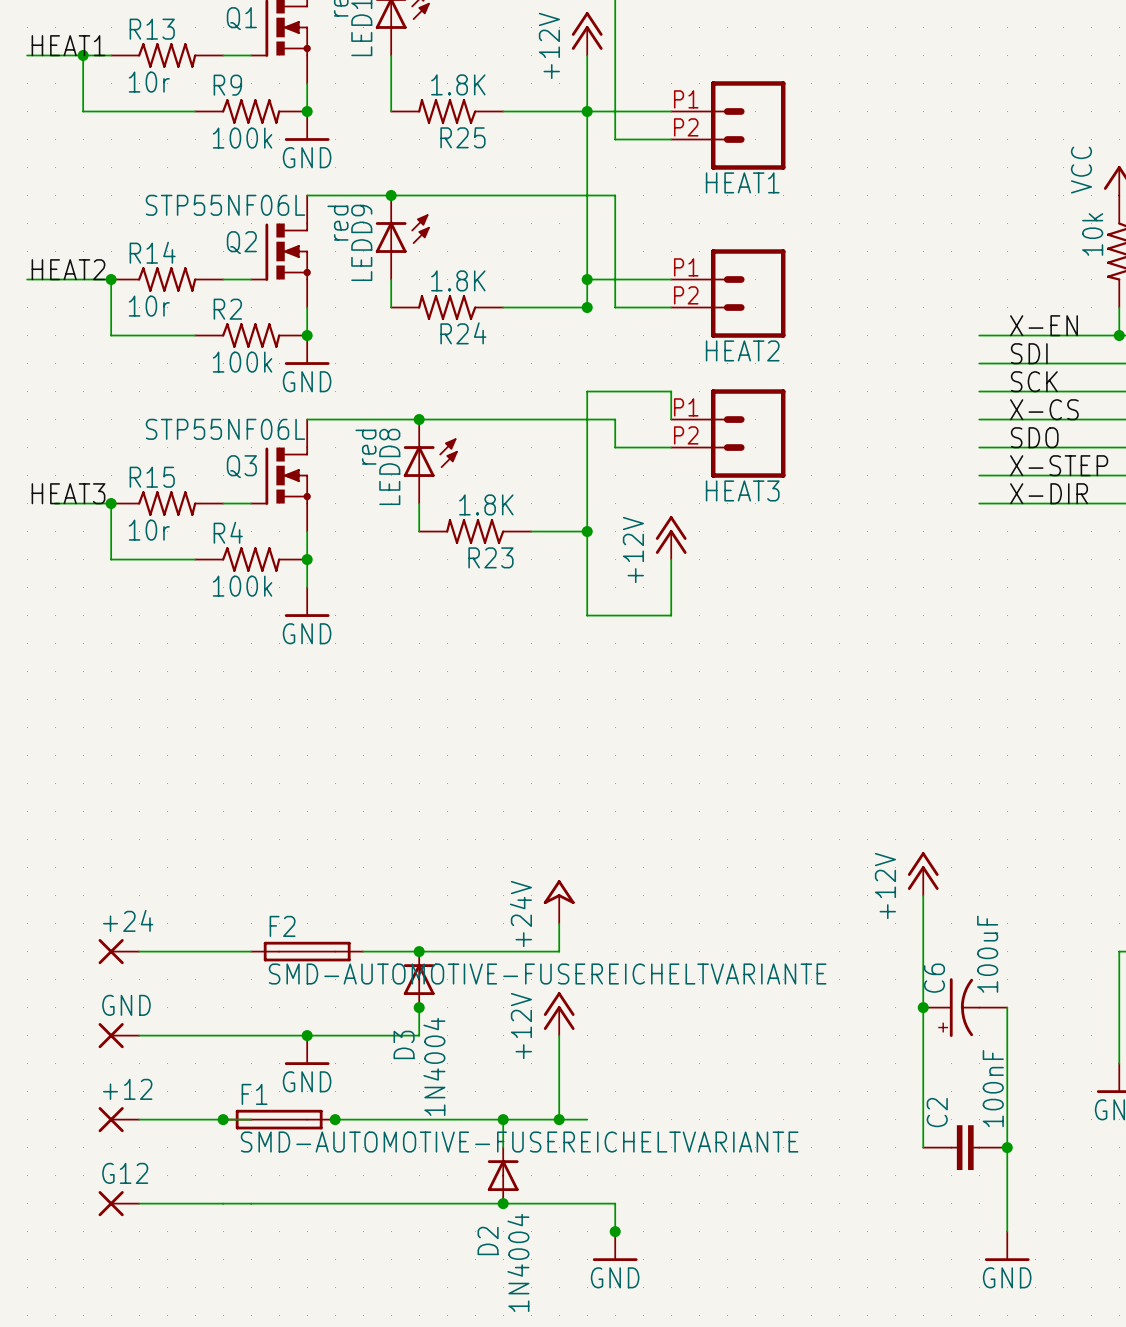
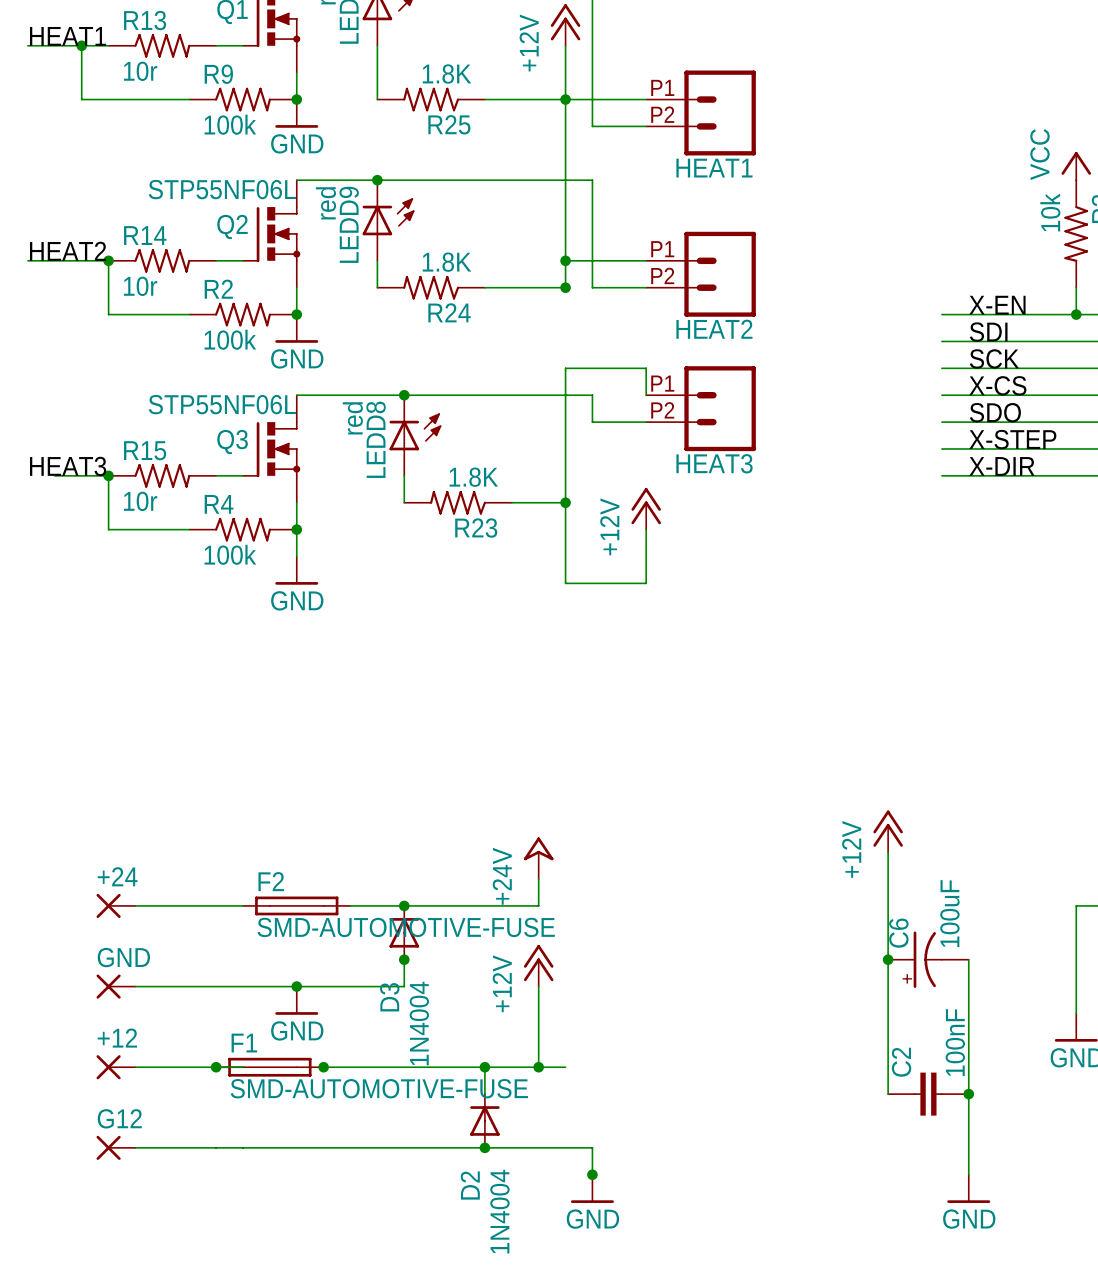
F2 value: SMD-AUTOMOTIVE-FUSEREICHELTVARIANTE (547, 974) -> SMD-AUTOMOTIVE-FUSE (406, 927)
F1 value: SMD-AUTOMOTIVE-FUSEREICHELTVARIANTE (519, 1142) -> SMD-AUTOMOTIVE-FUSE (379, 1088)

